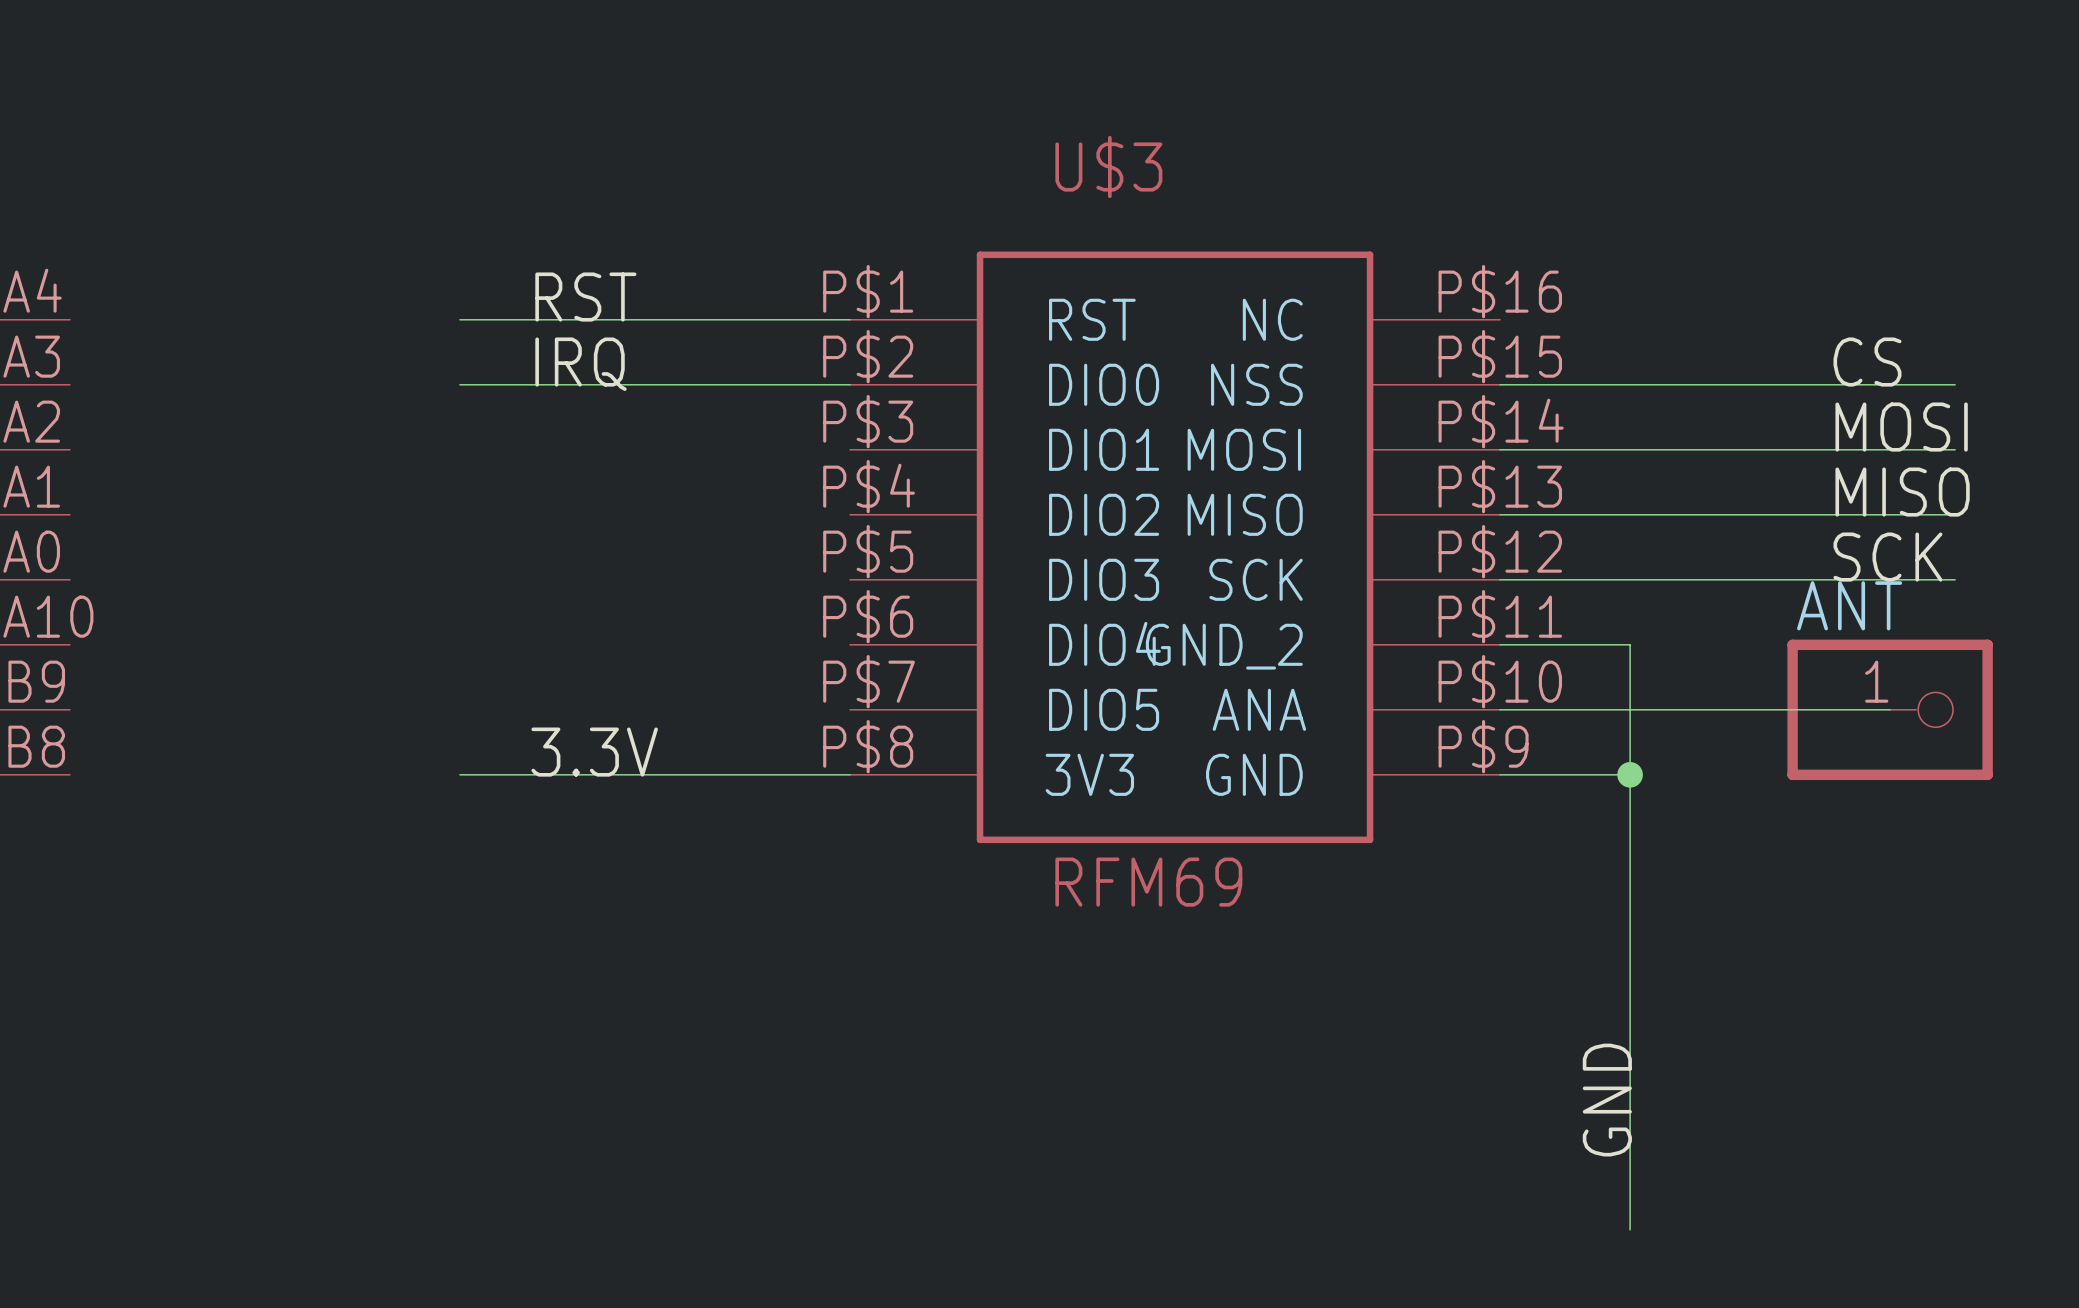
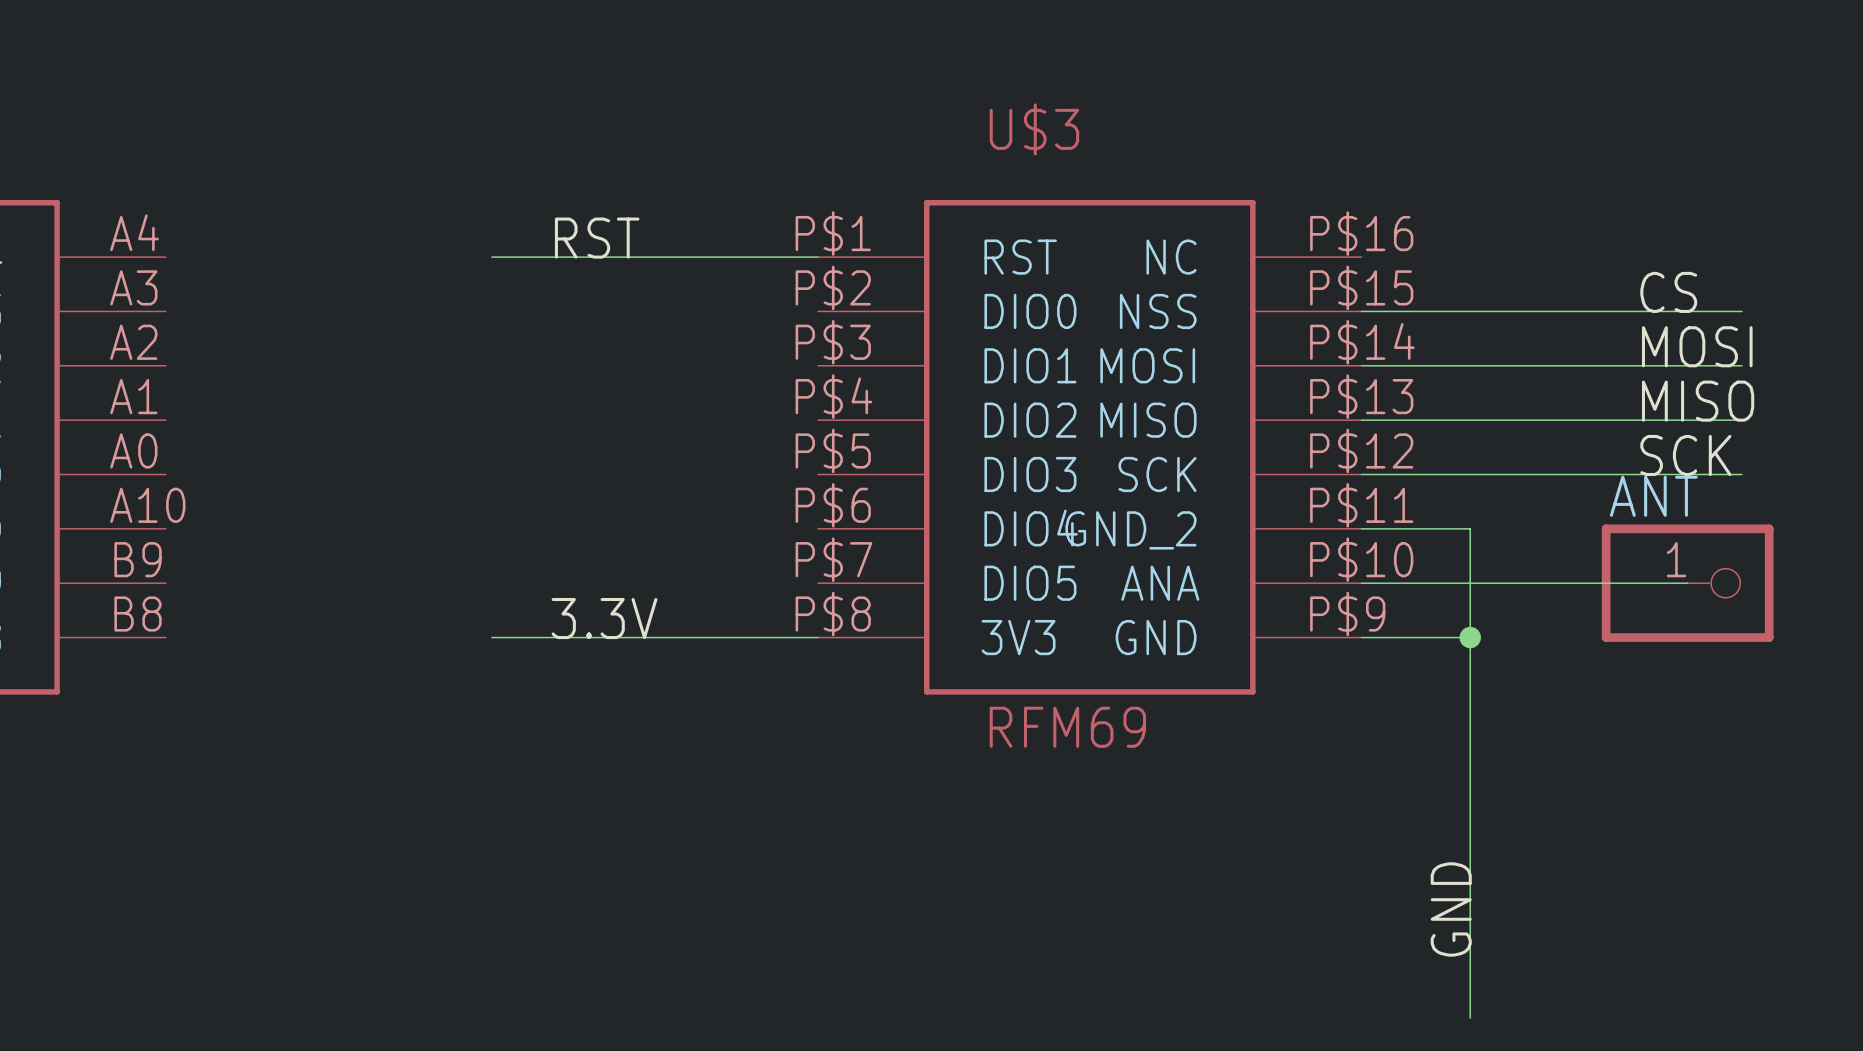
label: IRQ (581, 364) -> none
wire: (459, 384) (850, 384) -> none

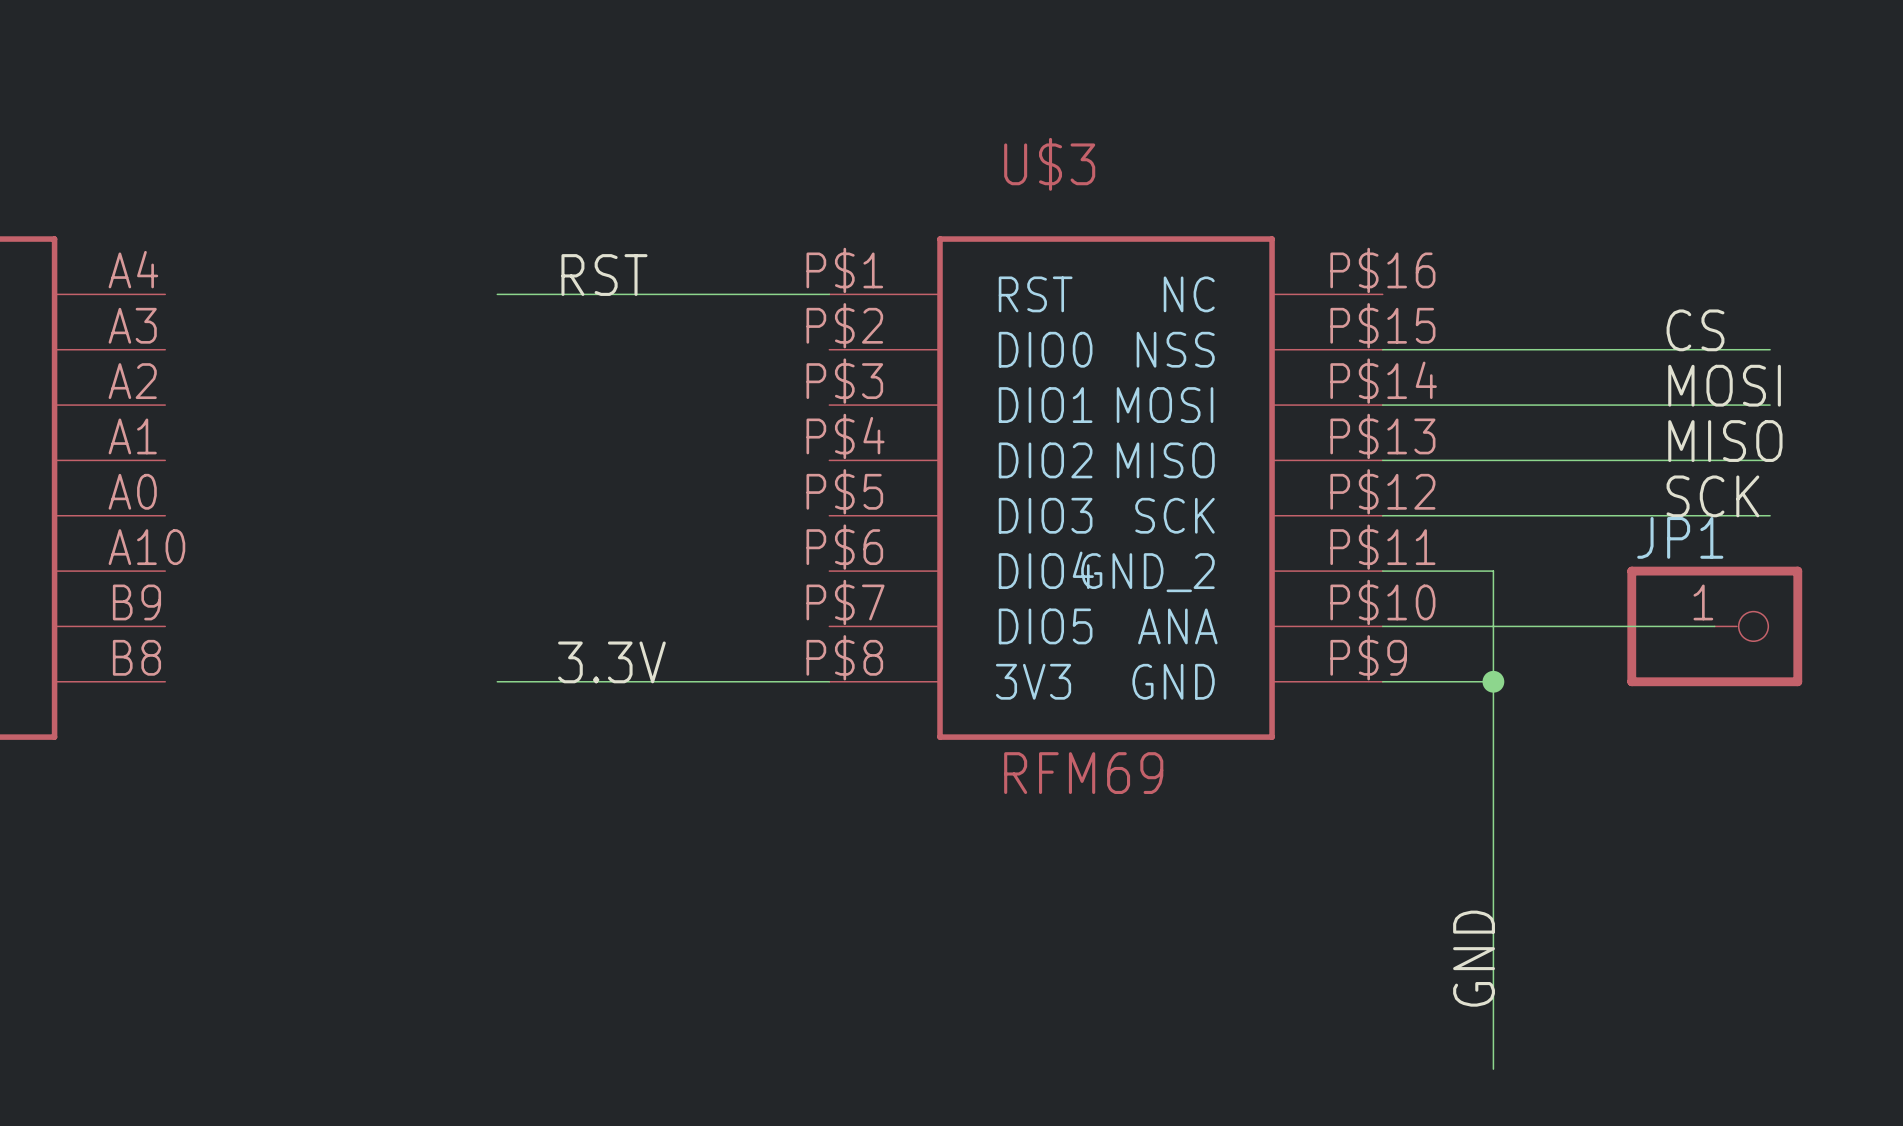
ANT name: ANT (1653, 496) -> JP1 (1680, 537)

